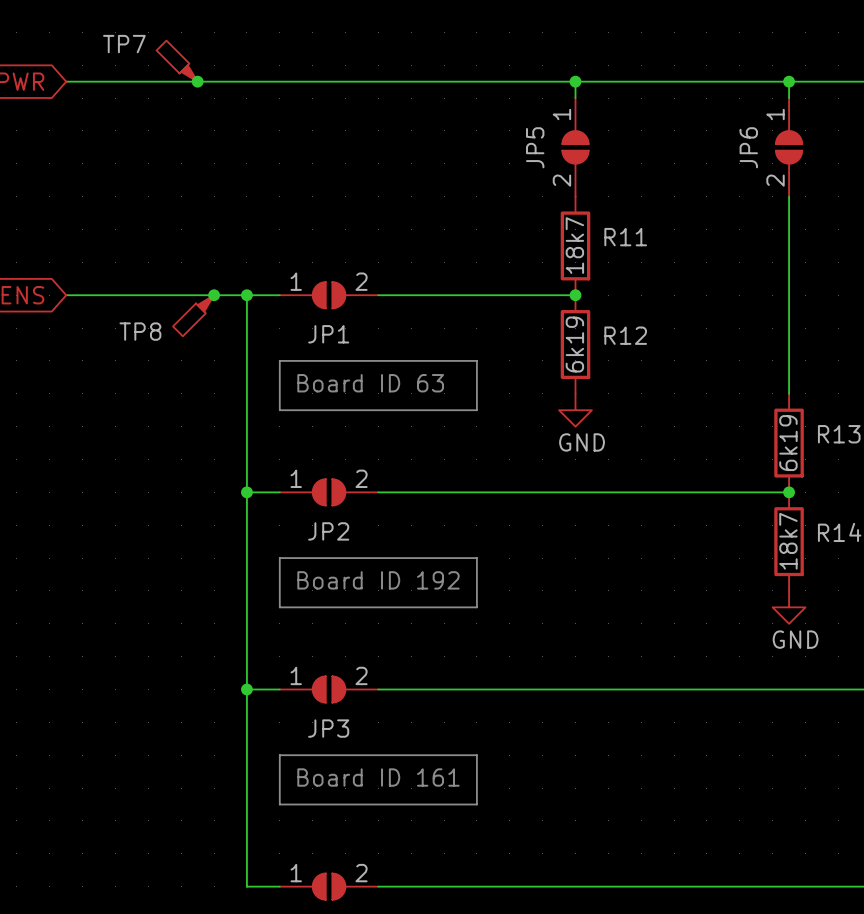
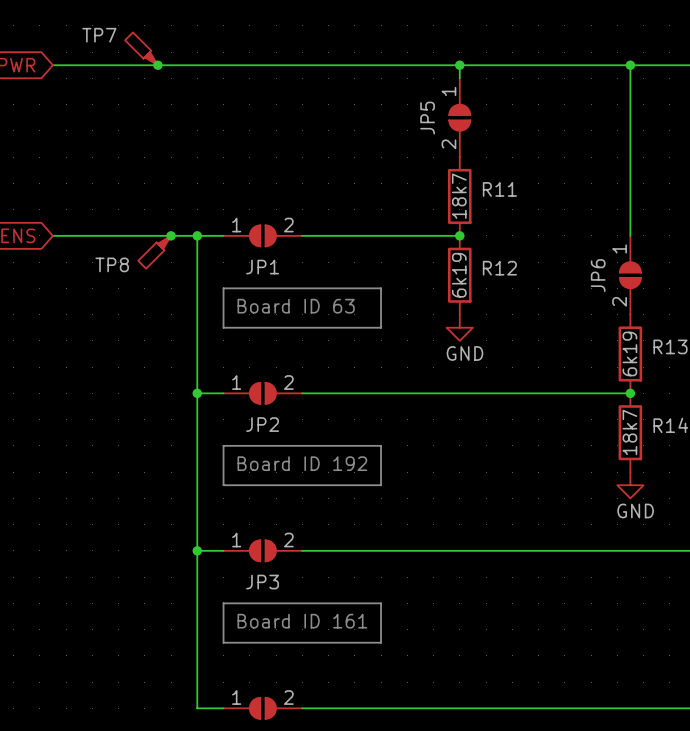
JP6 position: (789, 147) -> (630, 275)

